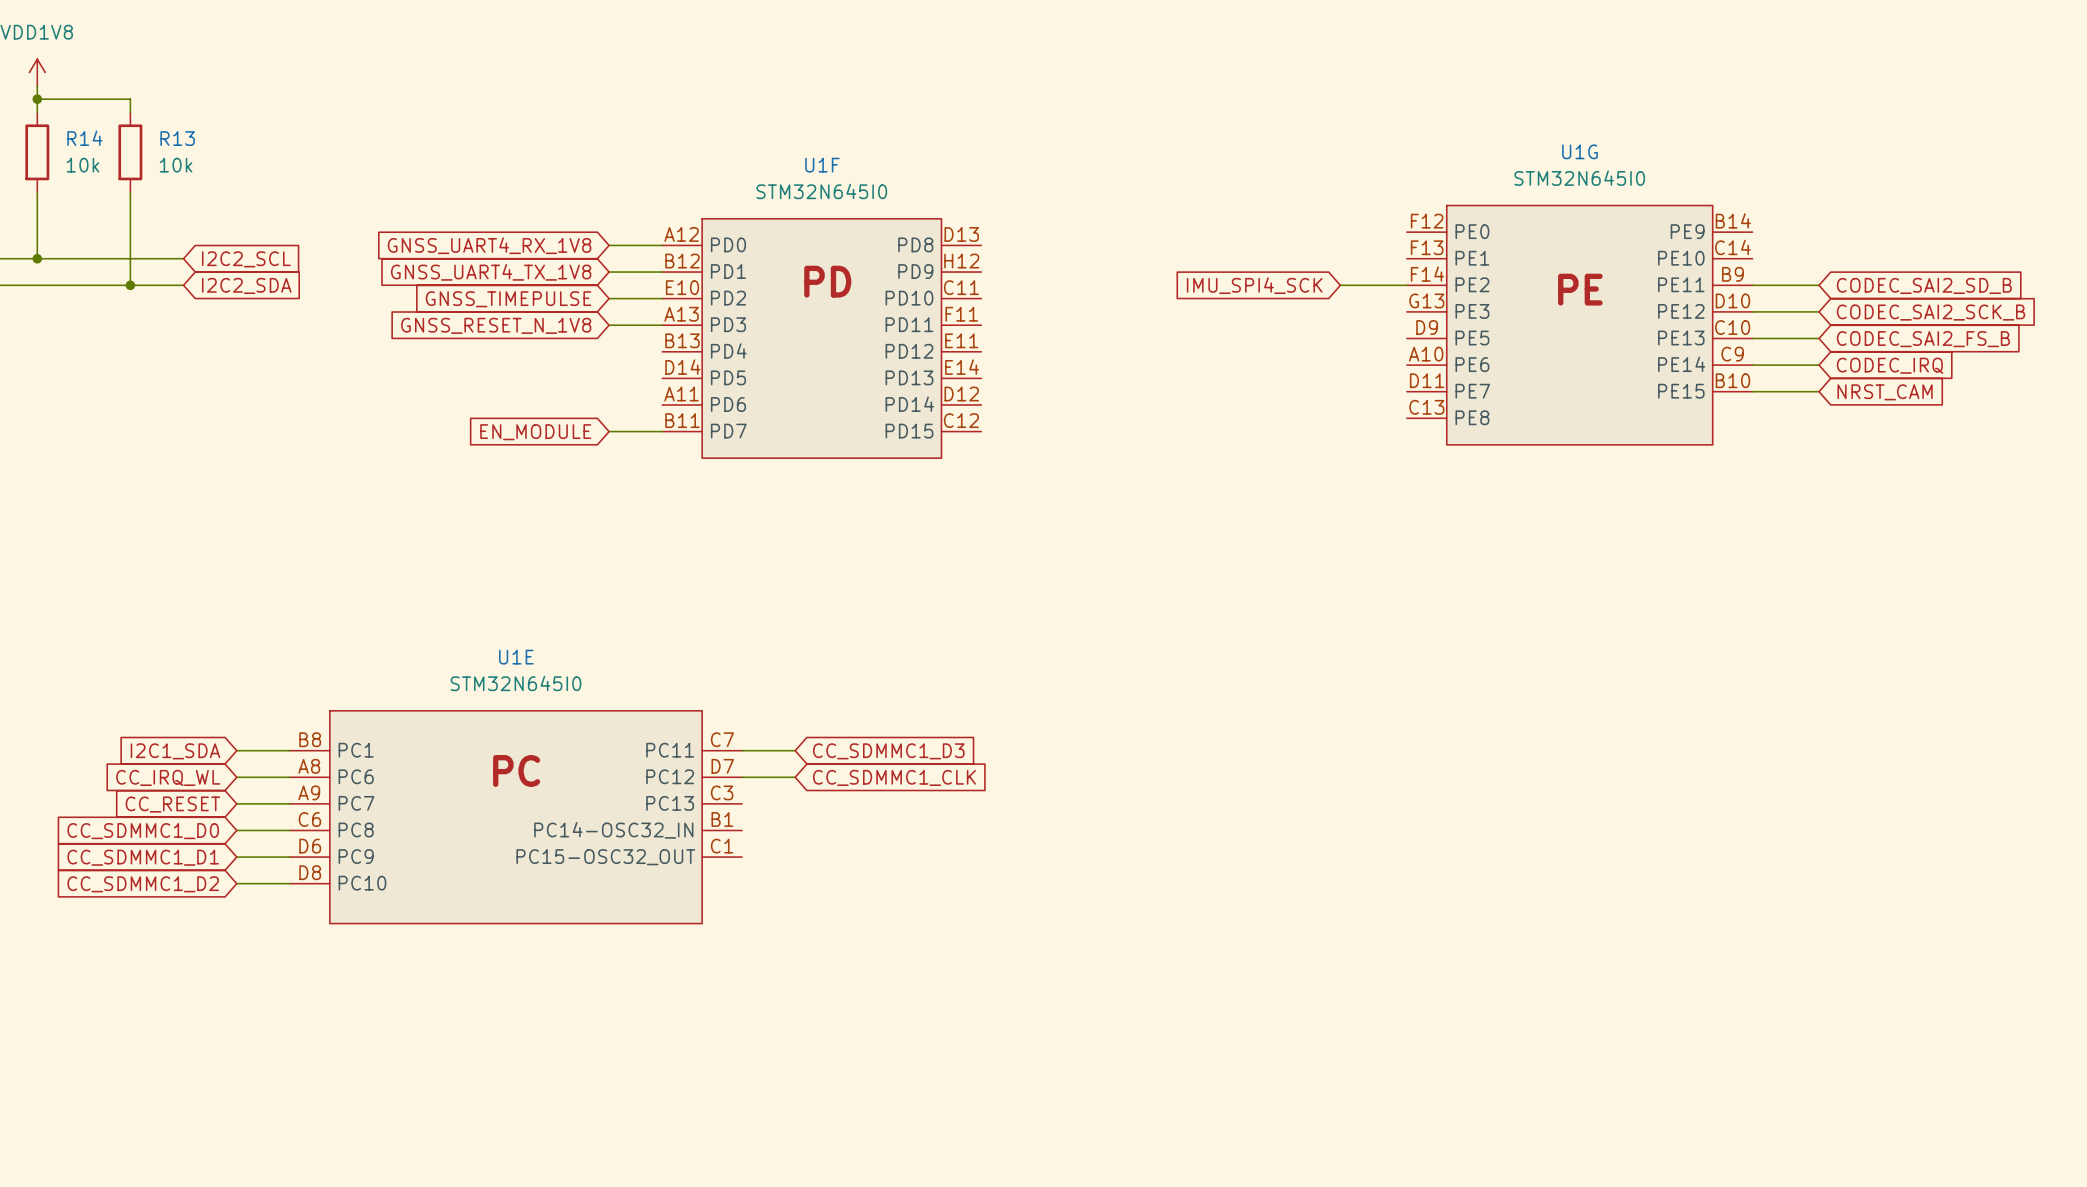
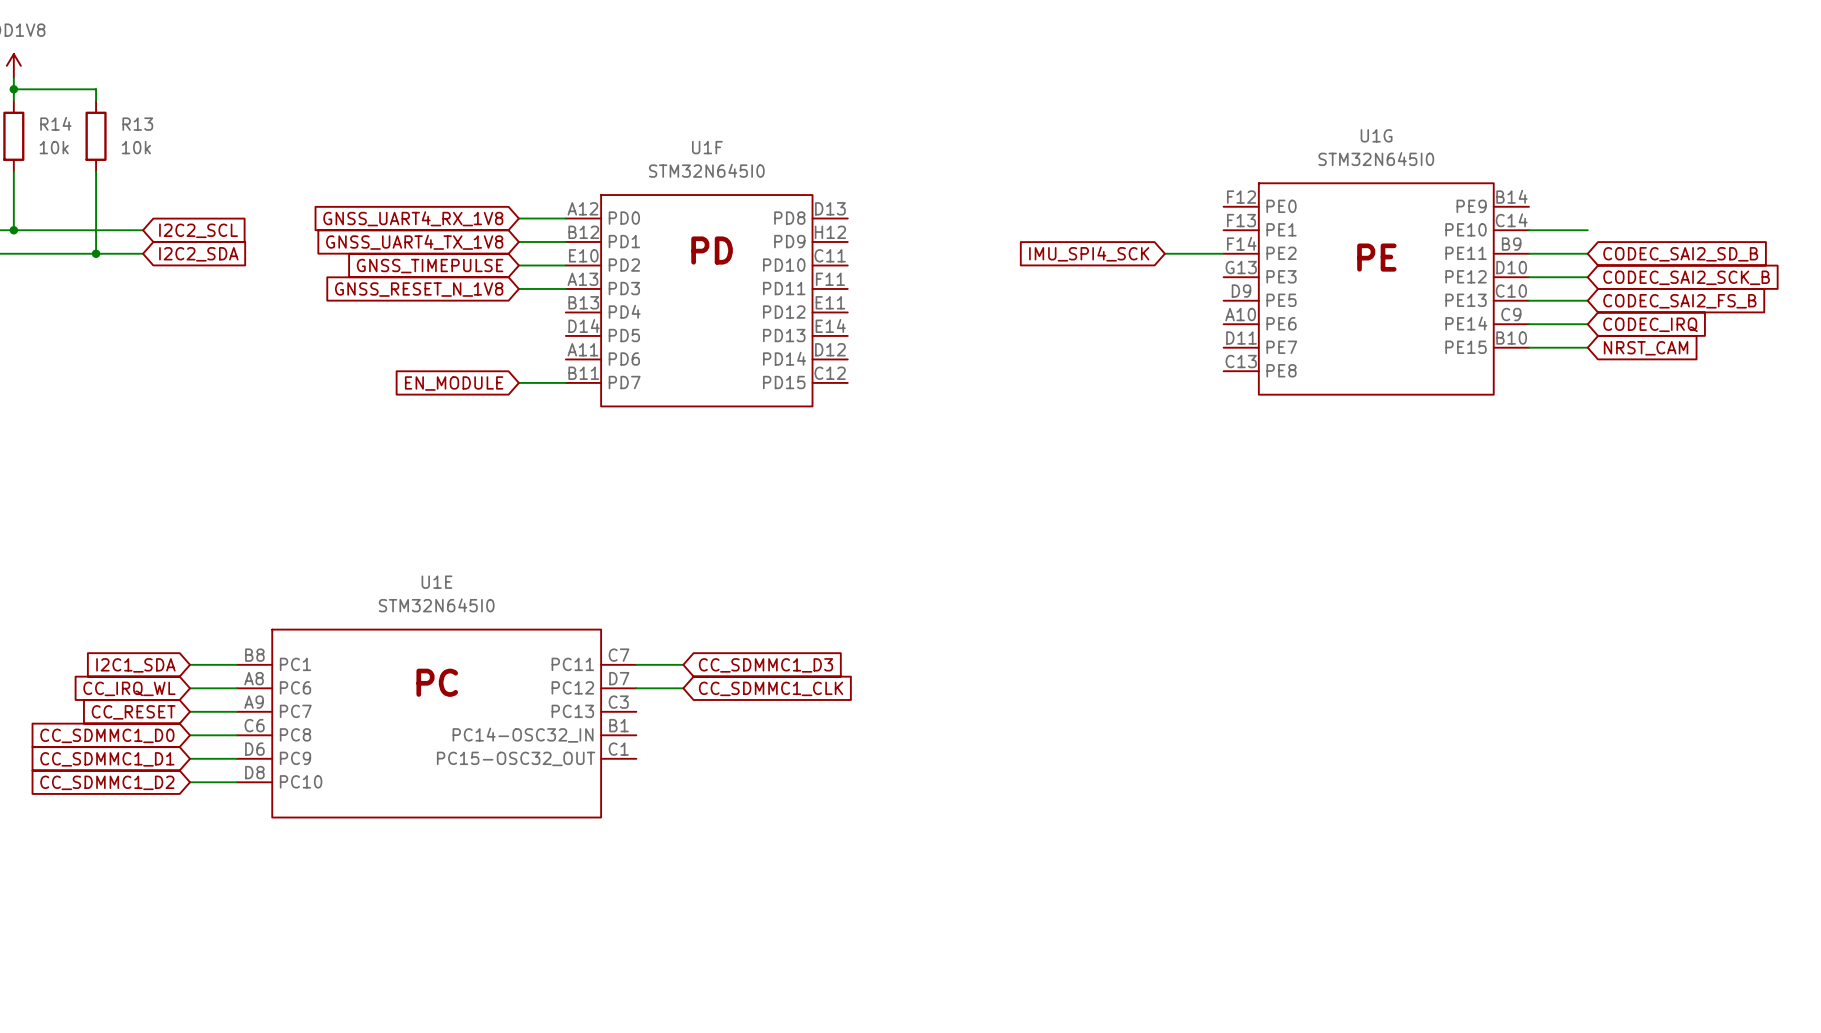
wire: none -> (1528, 230) (1587, 230)

